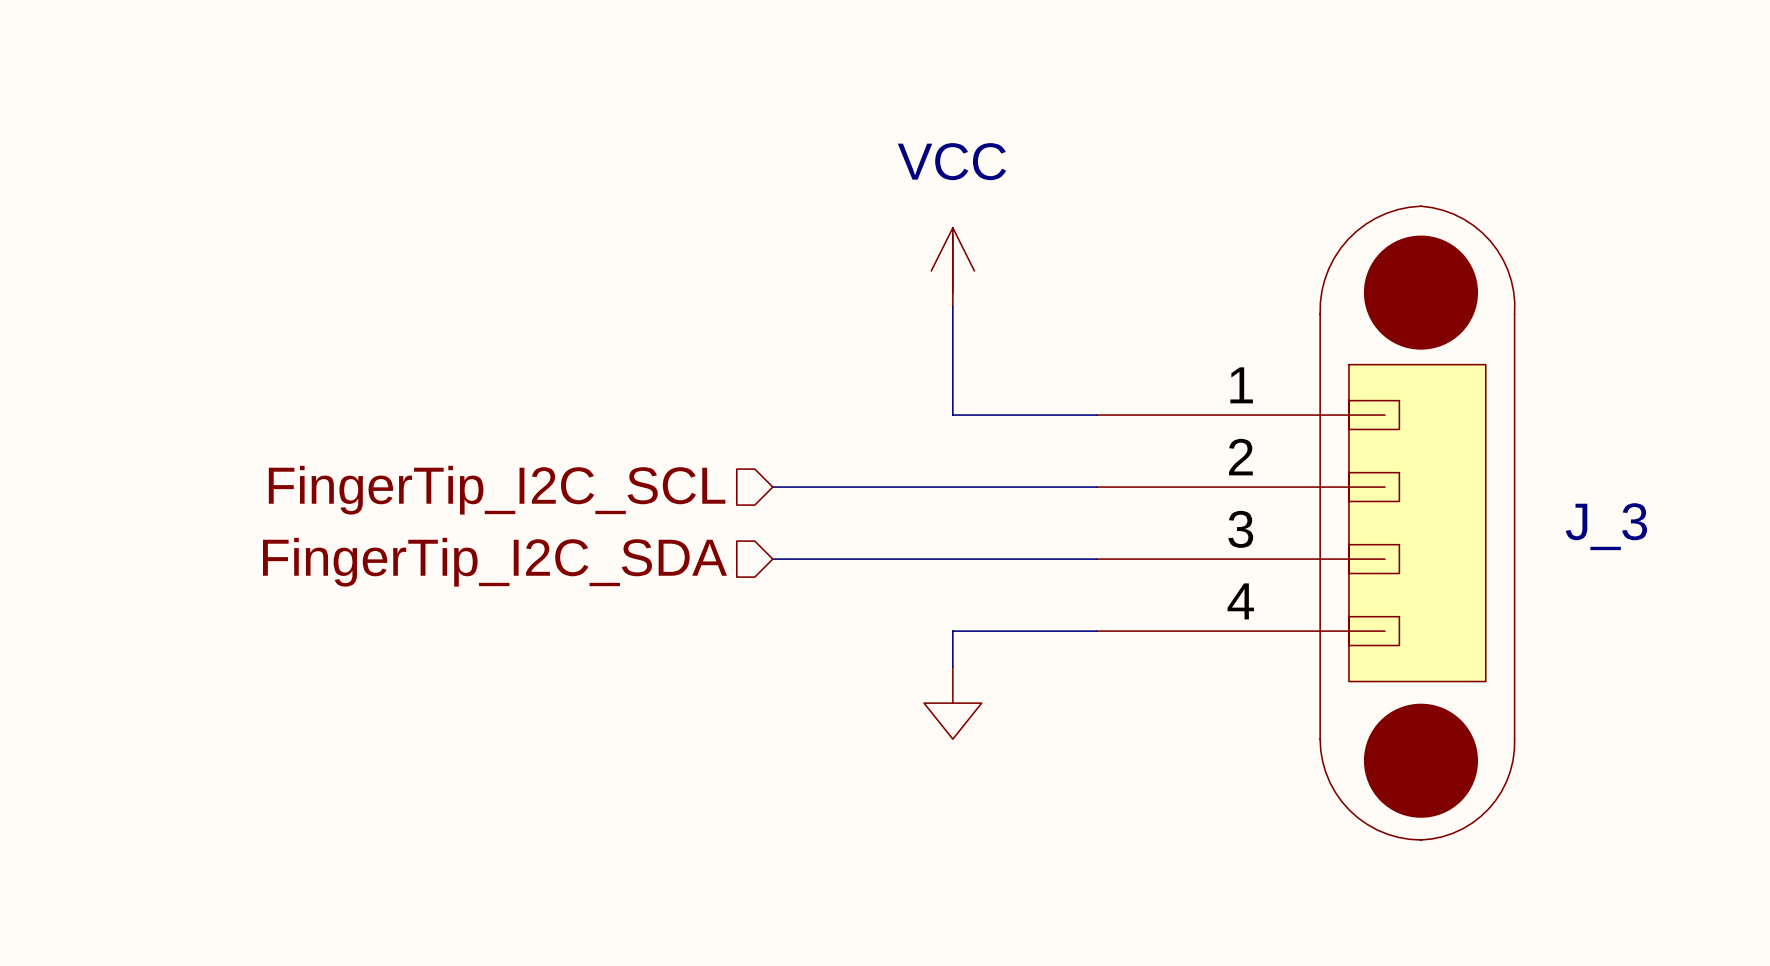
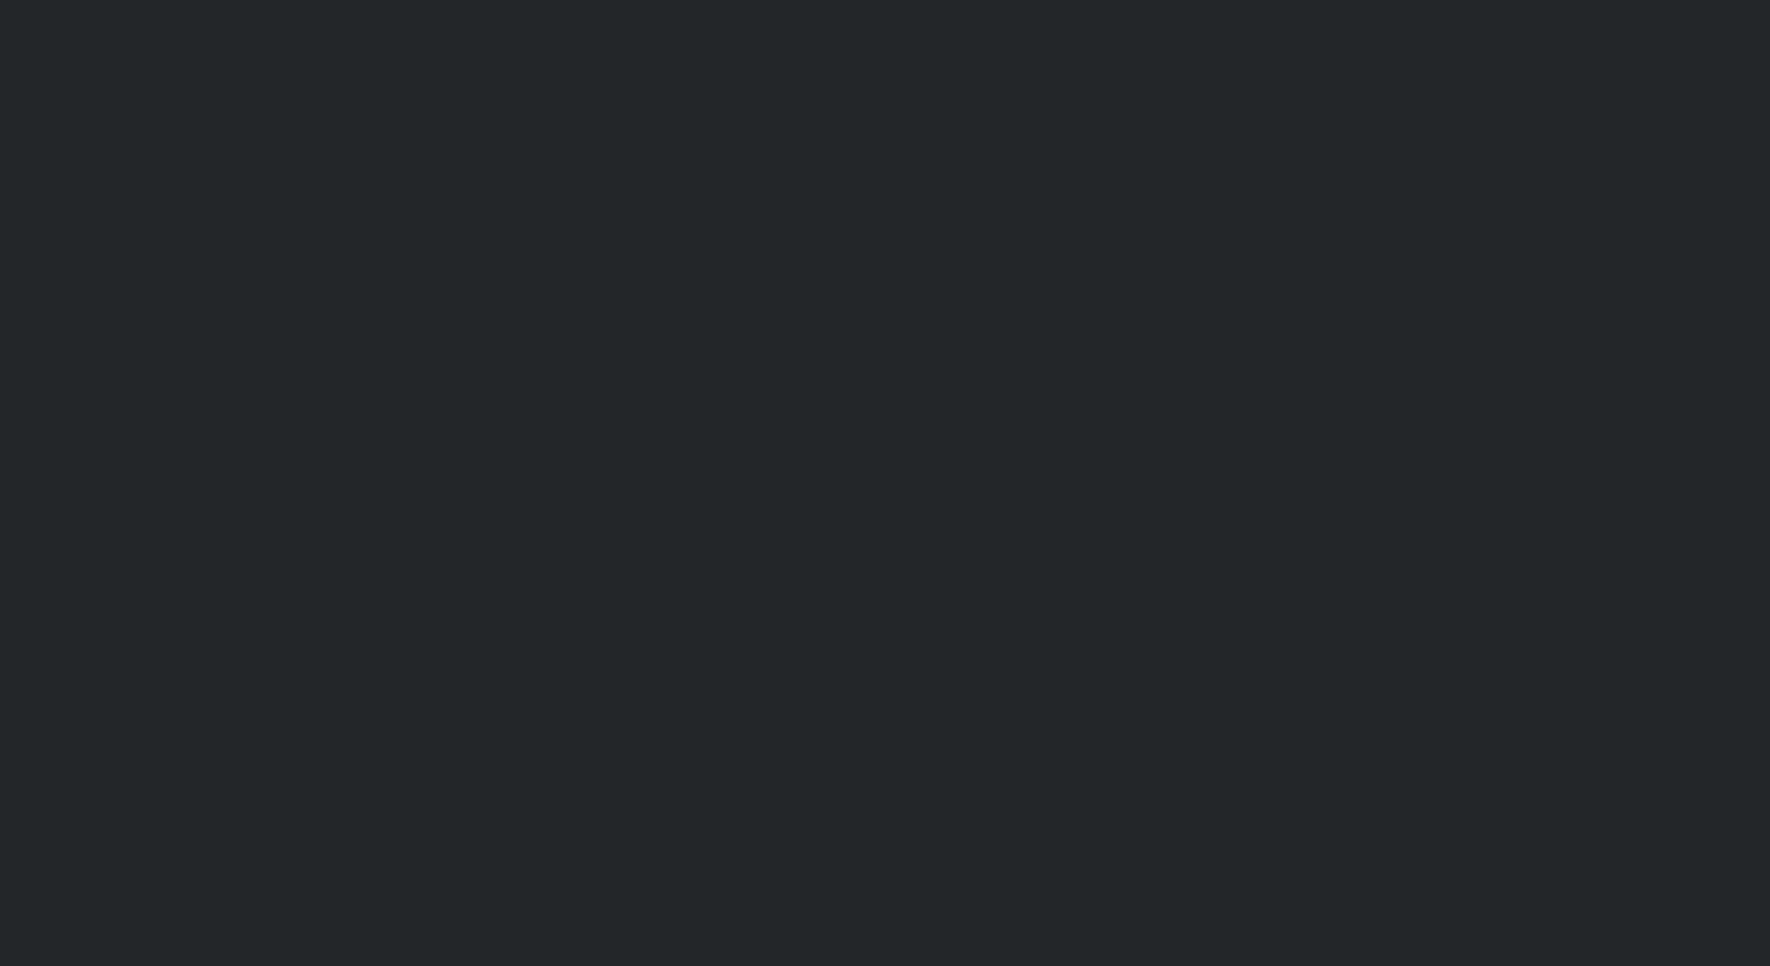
power symbol: VCC (952, 267) -> none
wire: (952, 307) (952, 415) (1096, 415) -> none
wire: (772, 487) (1096, 487) -> none
hierarchical label: FingerTip_I2C_SCL (497, 490) -> none
J_3: (1305, 523) -> none
wire: (772, 559) (1096, 559) -> none
hierarchical label: FingerTip_I2C_SDA (494, 562) -> none
wire: (1096, 631) (952, 631) (952, 667) -> none
power symbol: (952, 703) -> none

